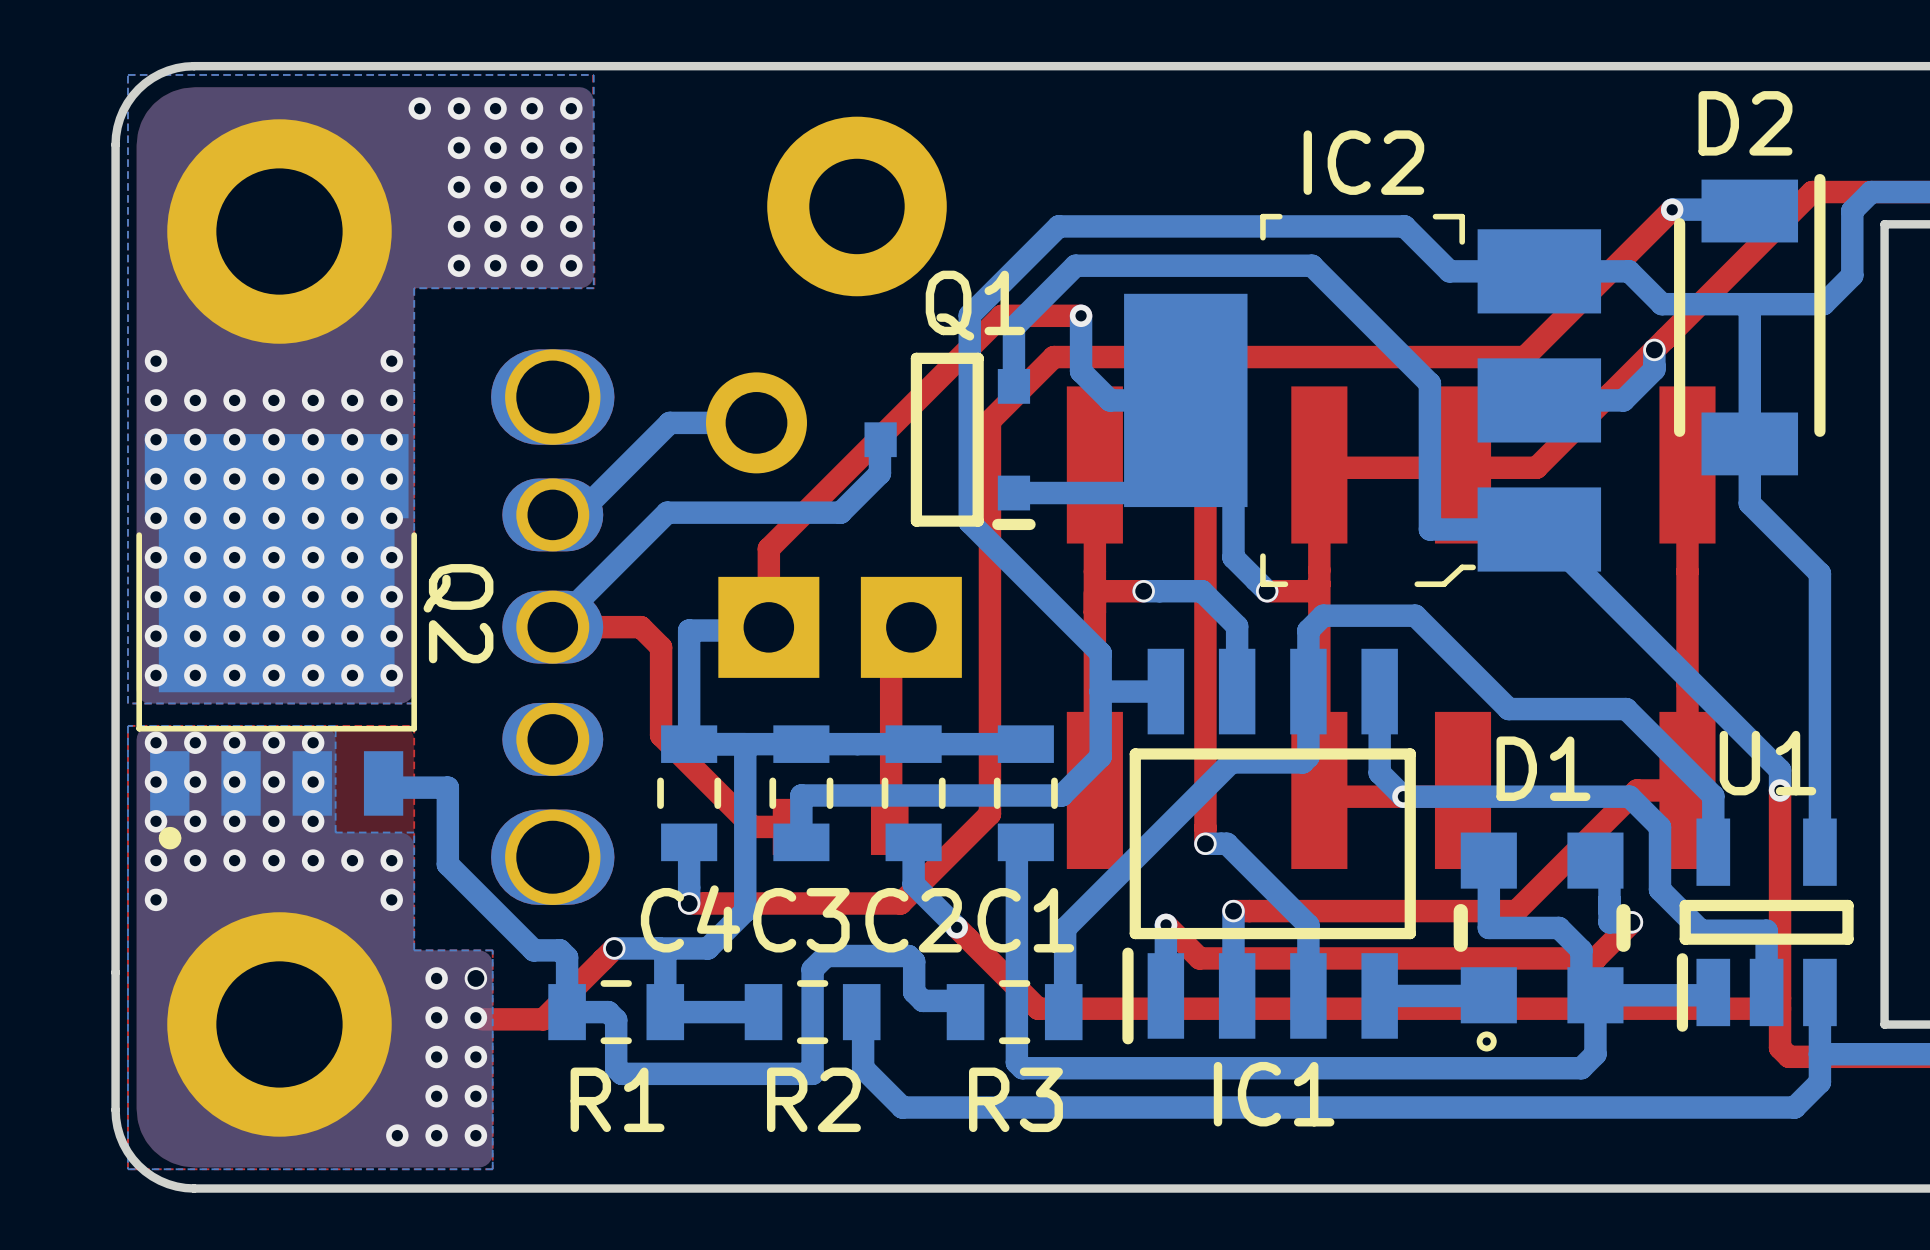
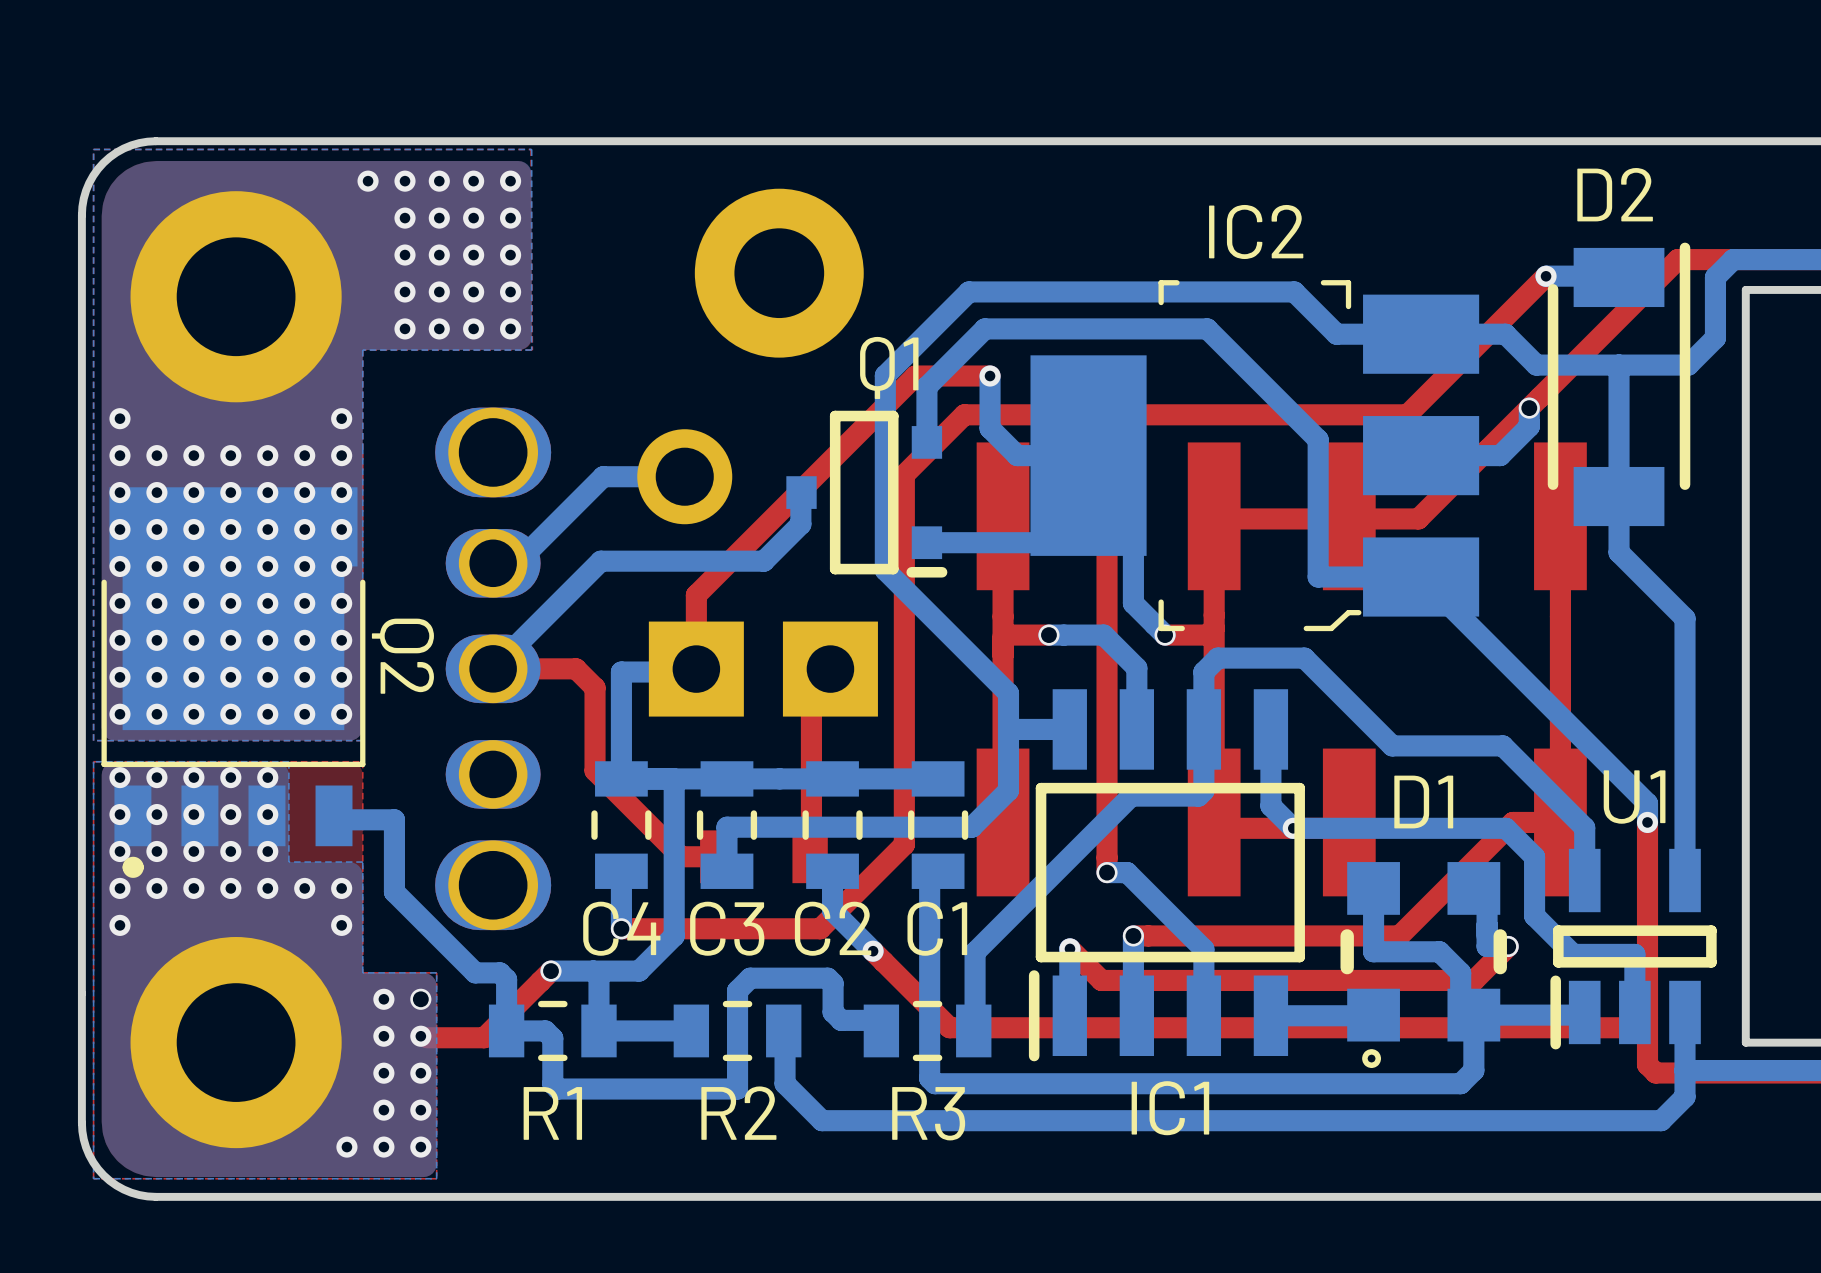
C4 name position: C4 (690, 918) -> C4 (621, 928)
C3 name position: C3 (801, 920) -> C3 (727, 928)
C2 name position: C2 (913, 920) -> C2 (833, 928)
C1 name position: C1 (1025, 920) -> C1 (937, 928)

